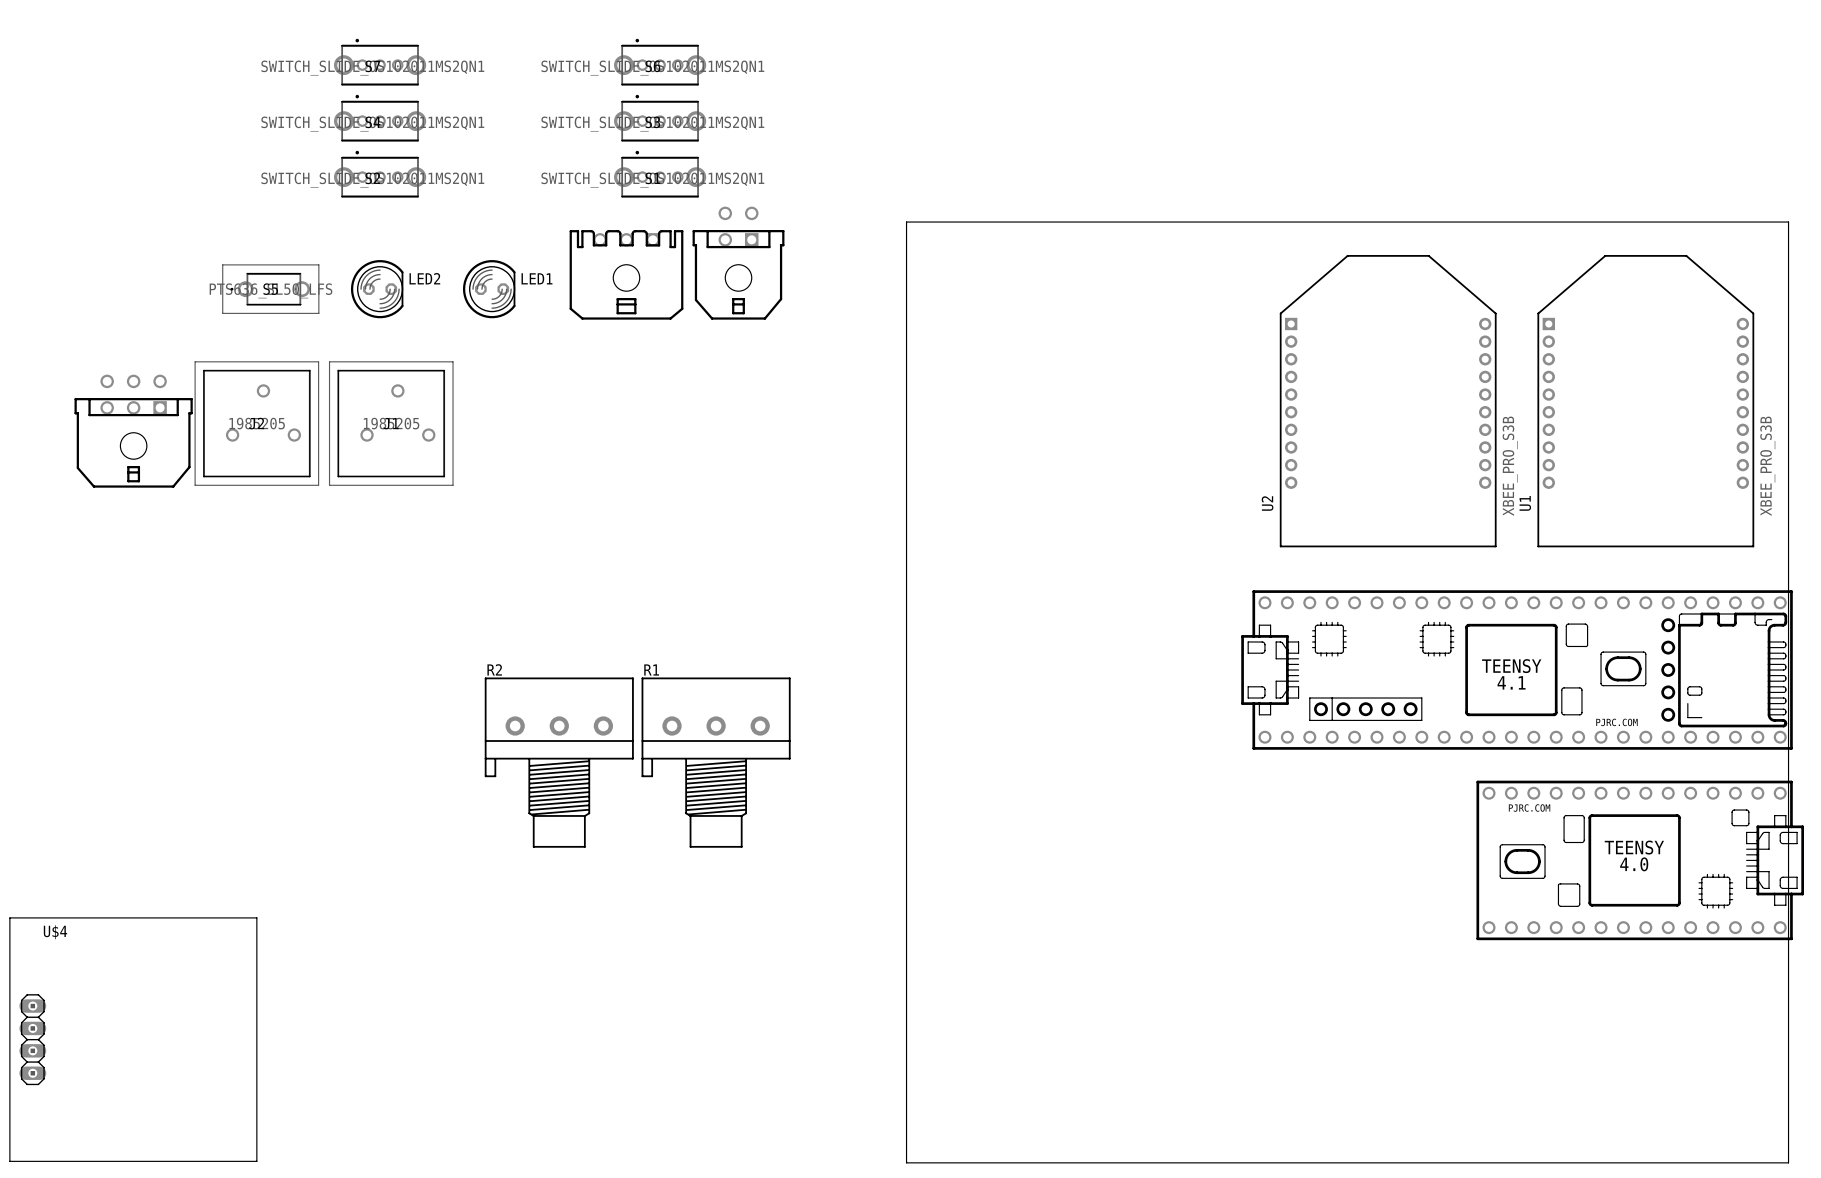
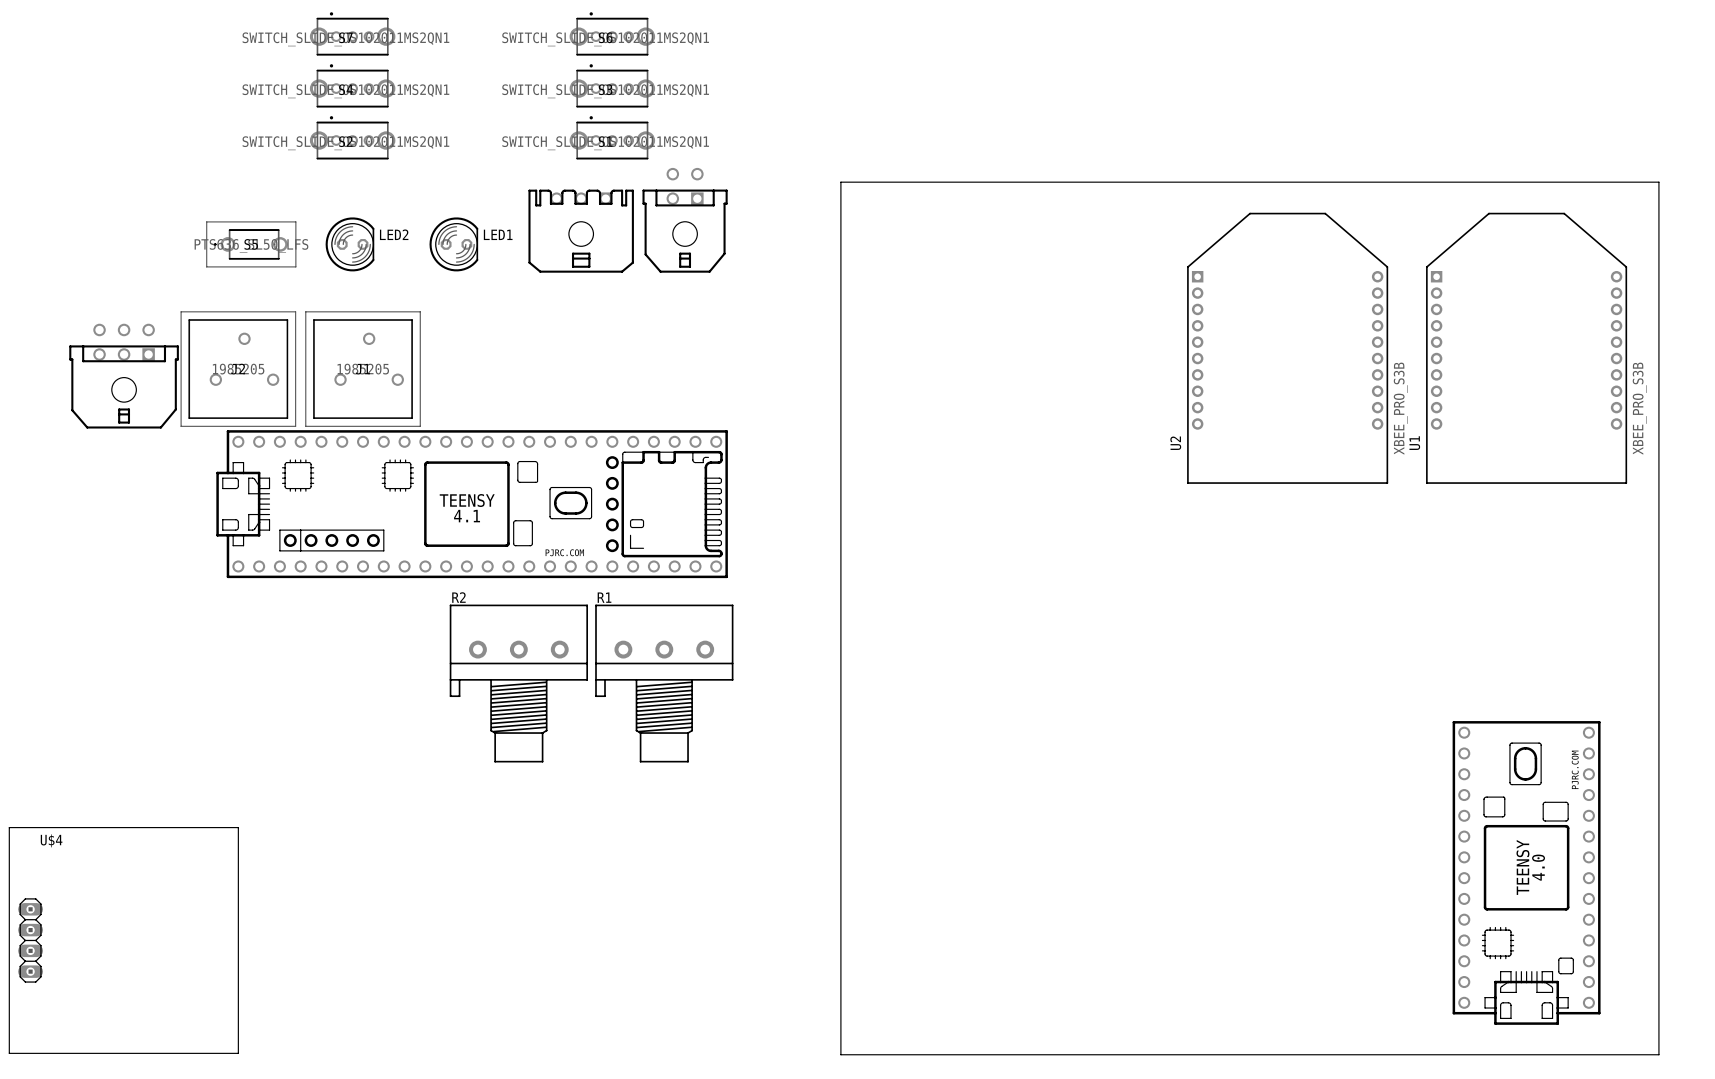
part: none -> (472, 504)
part: (1517, 670) -> none
part: (1640, 860) -> none
part: none -> (1526, 872)

